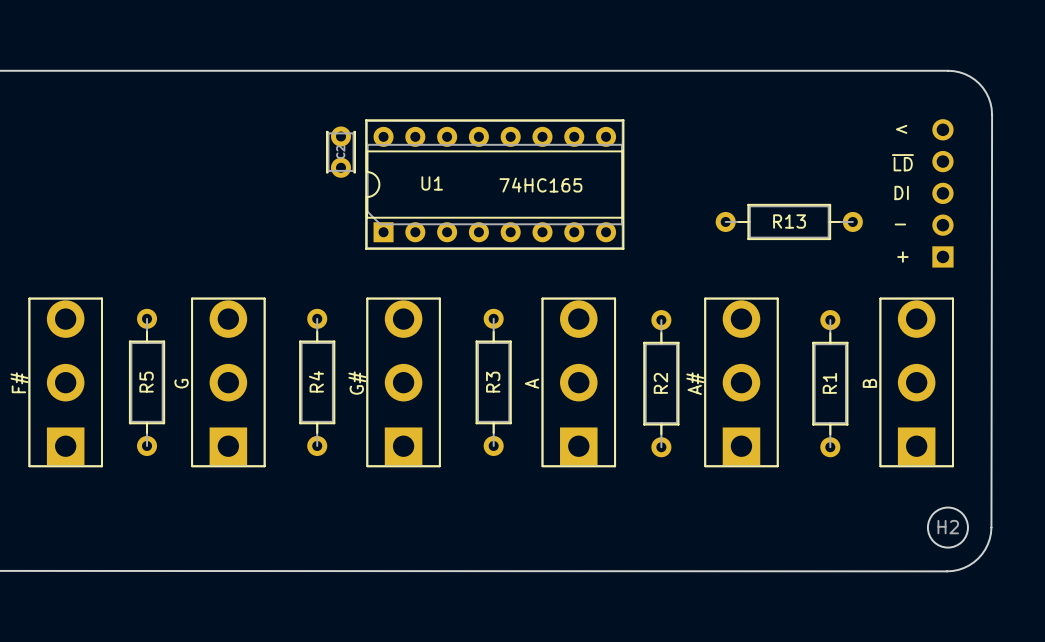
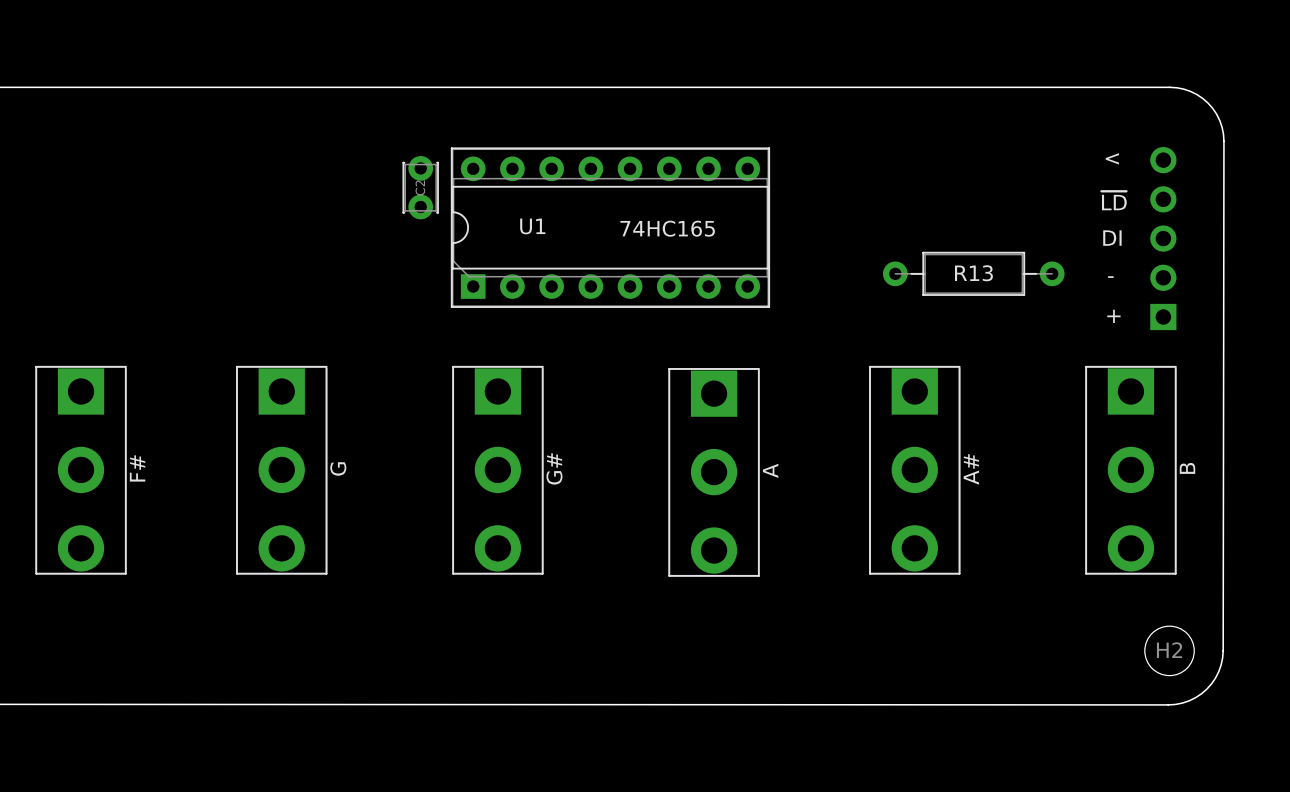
part rotation: 0° (65, 382) -> 180° (81, 470)
R5: (147, 382) -> none
part rotation: 0° (228, 382) -> 180° (281, 470)
R4: (317, 382) -> none
part rotation: 0° (403, 382) -> 180° (497, 470)
R3: (493, 382) -> none
part rotation: 0° (578, 382) -> 180° (714, 472)
part rotation: 0° (741, 382) -> 180° (914, 470)
part rotation: 0° (916, 382) -> 180° (1130, 470)
R2: (661, 383) -> none
R1: (830, 383) -> none

